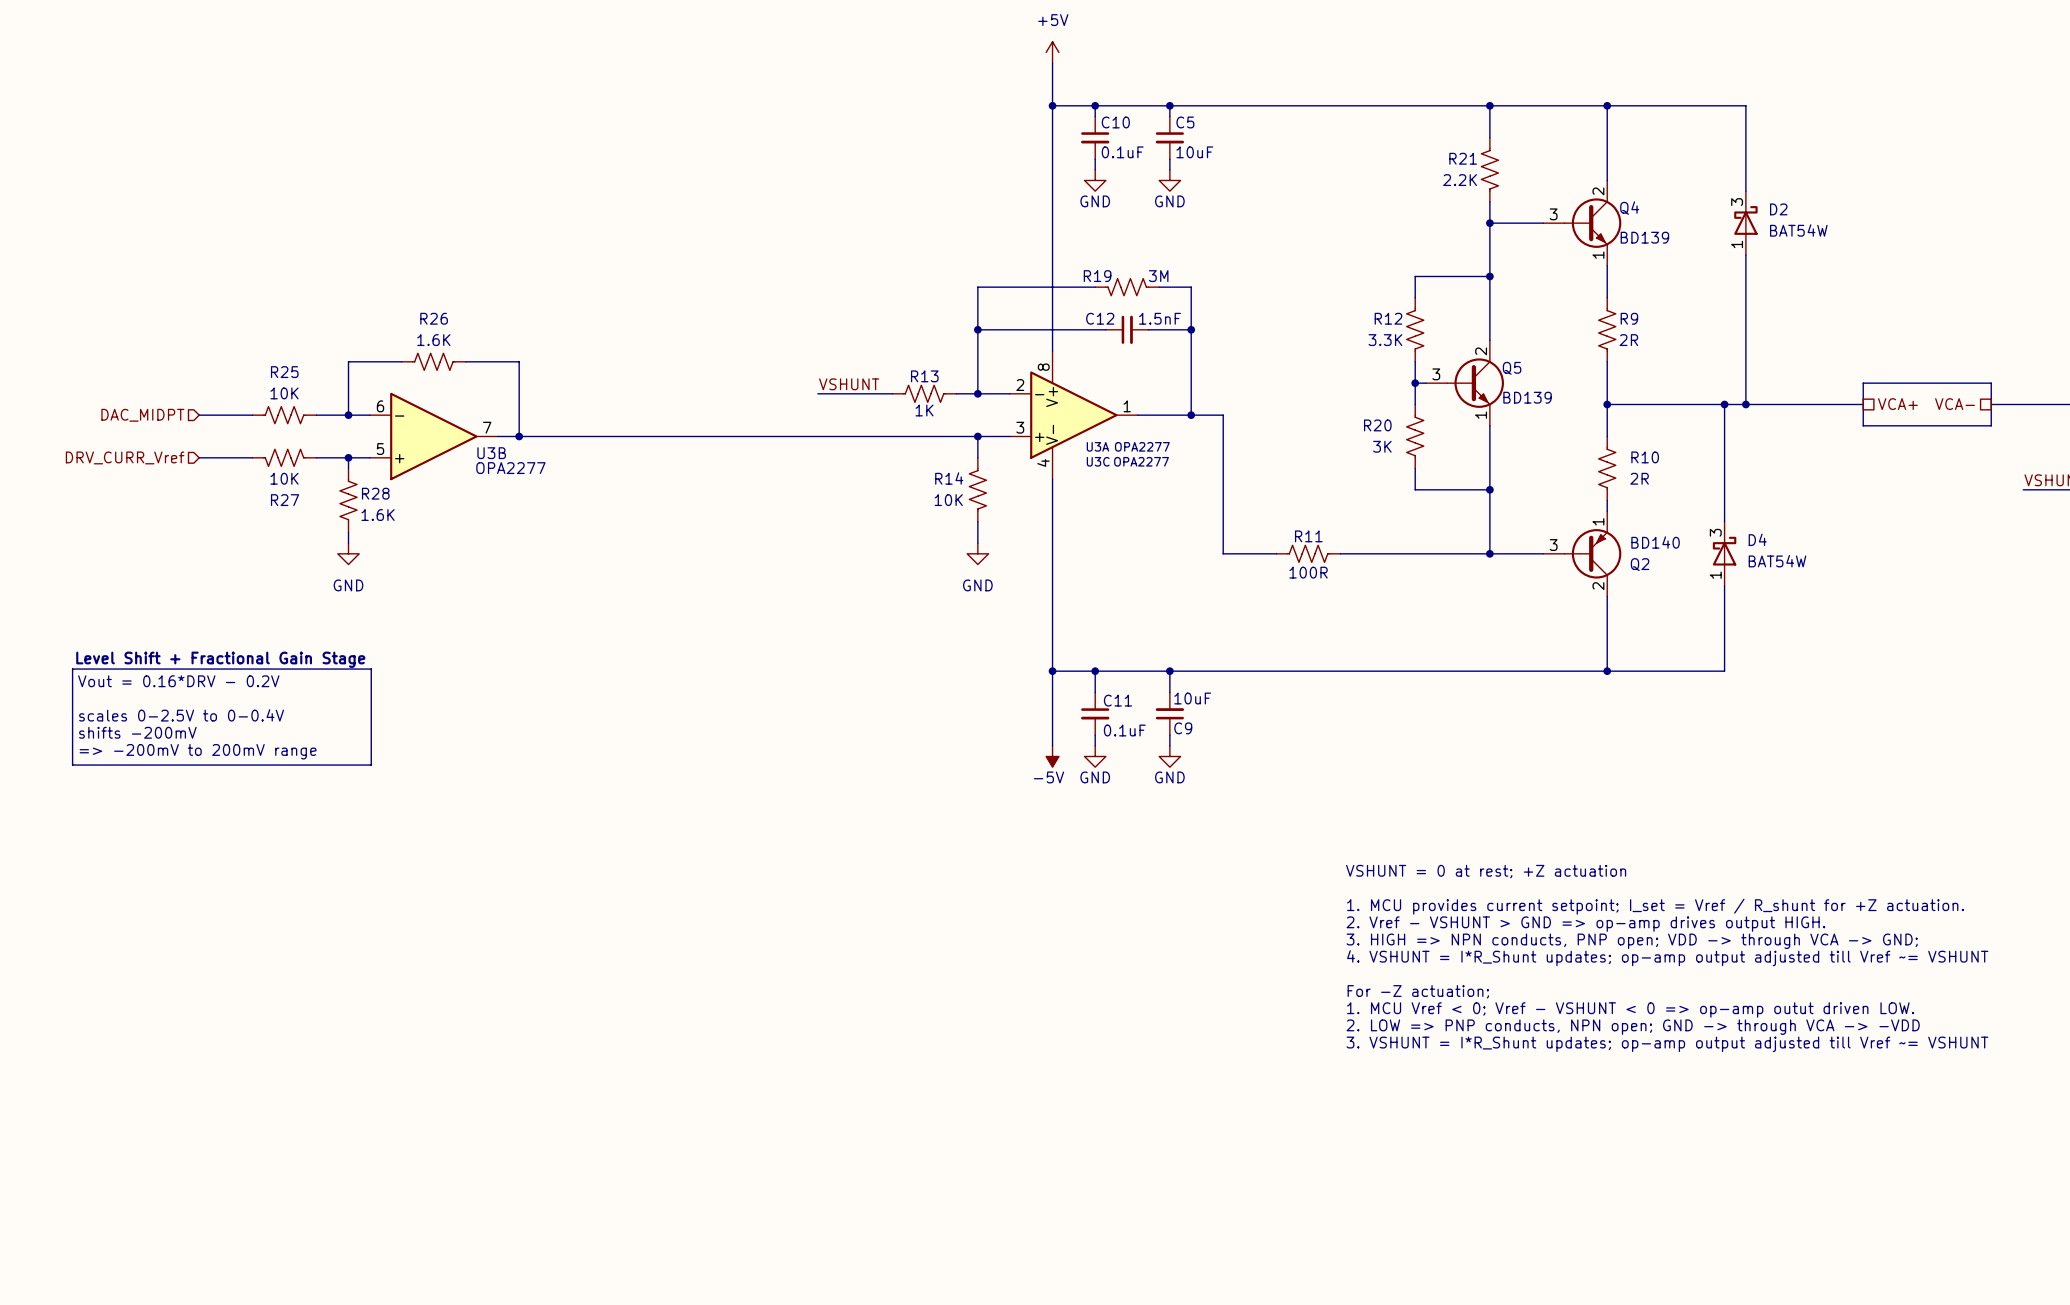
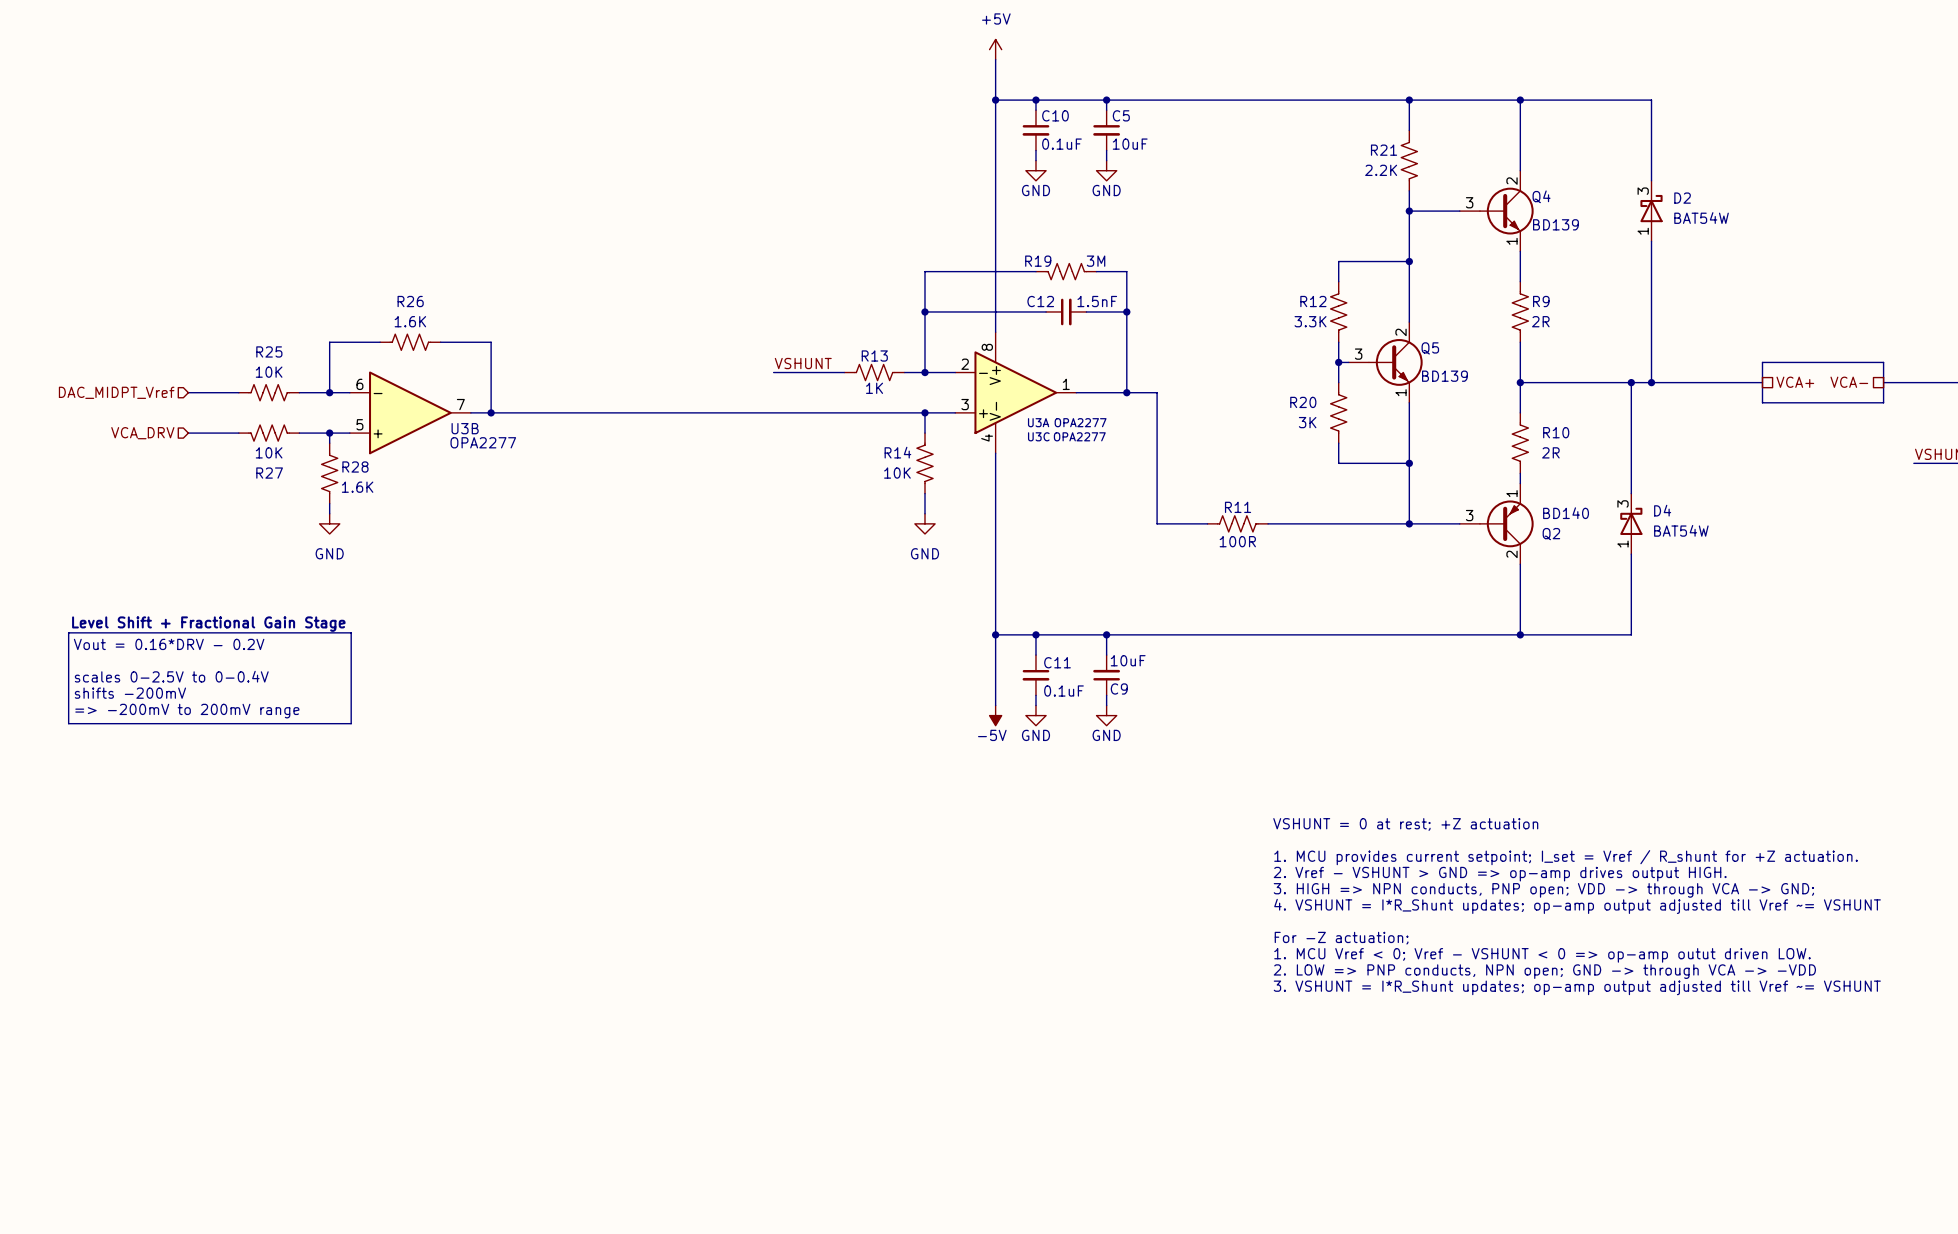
hierarchical label: DAC_MIDPT (142, 415) -> DAC_MIDPT_Vref (116, 392)
hierarchical label: DRV_CURR_Vref (125, 457) -> VCA_DRV (142, 433)

